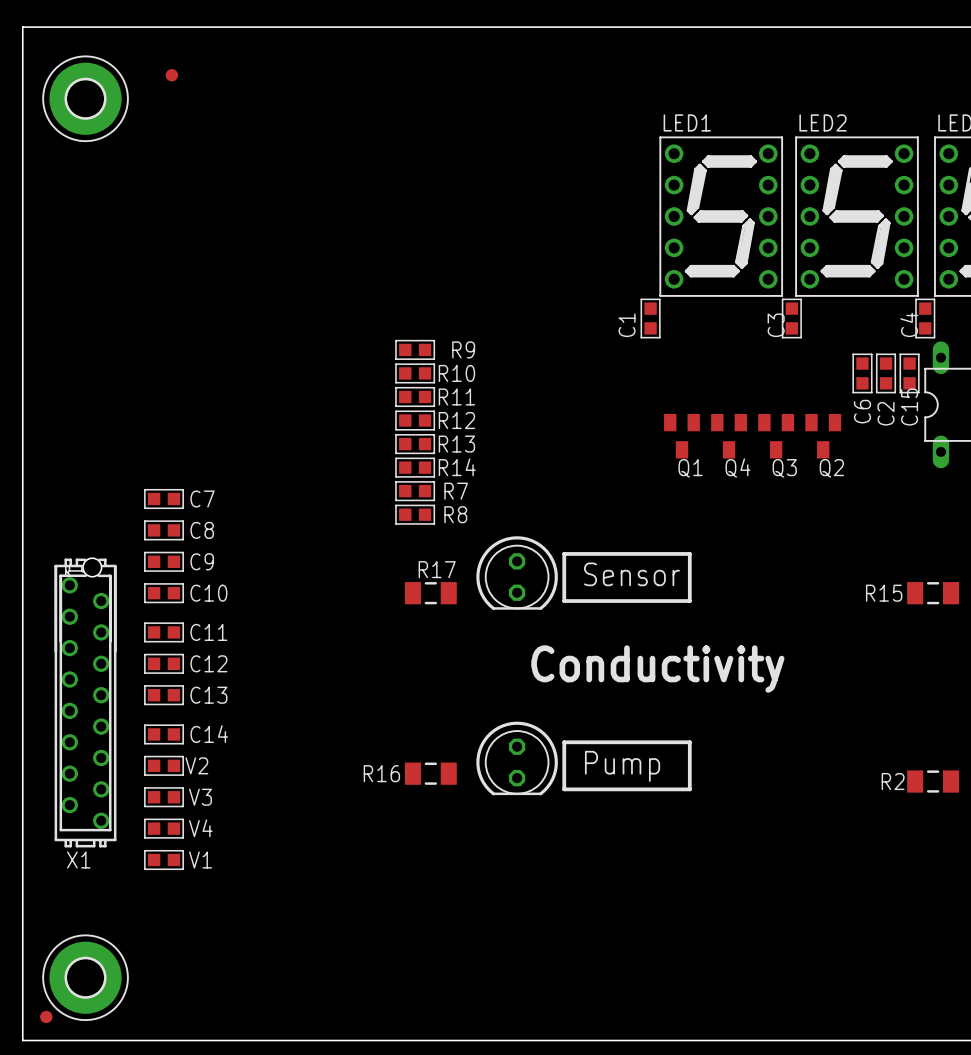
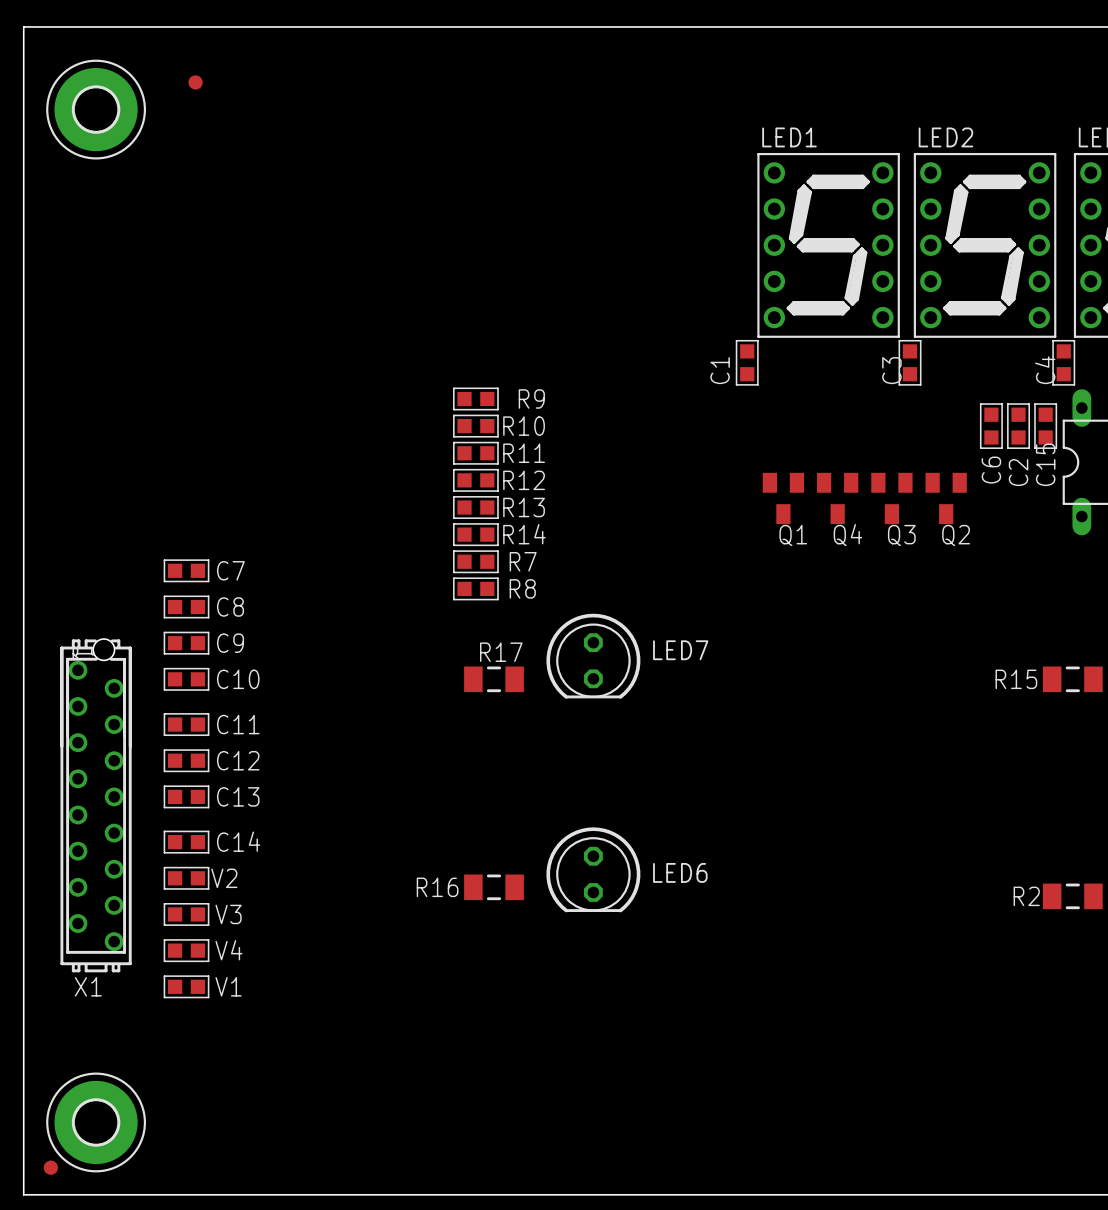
line: (564, 553) (689, 553) (689, 601) (564, 601) (564, 553) -> none
LED7 name: none -> LED7 (680, 650)
text: Sensor (631, 574) -> none
text: Conductivity (657, 669) -> none
line: (564, 742) (564, 789) (689, 789) (689, 742) (564, 742) -> none
LED6 name: none -> LED6 (680, 872)
text: Pump (622, 766) -> none

